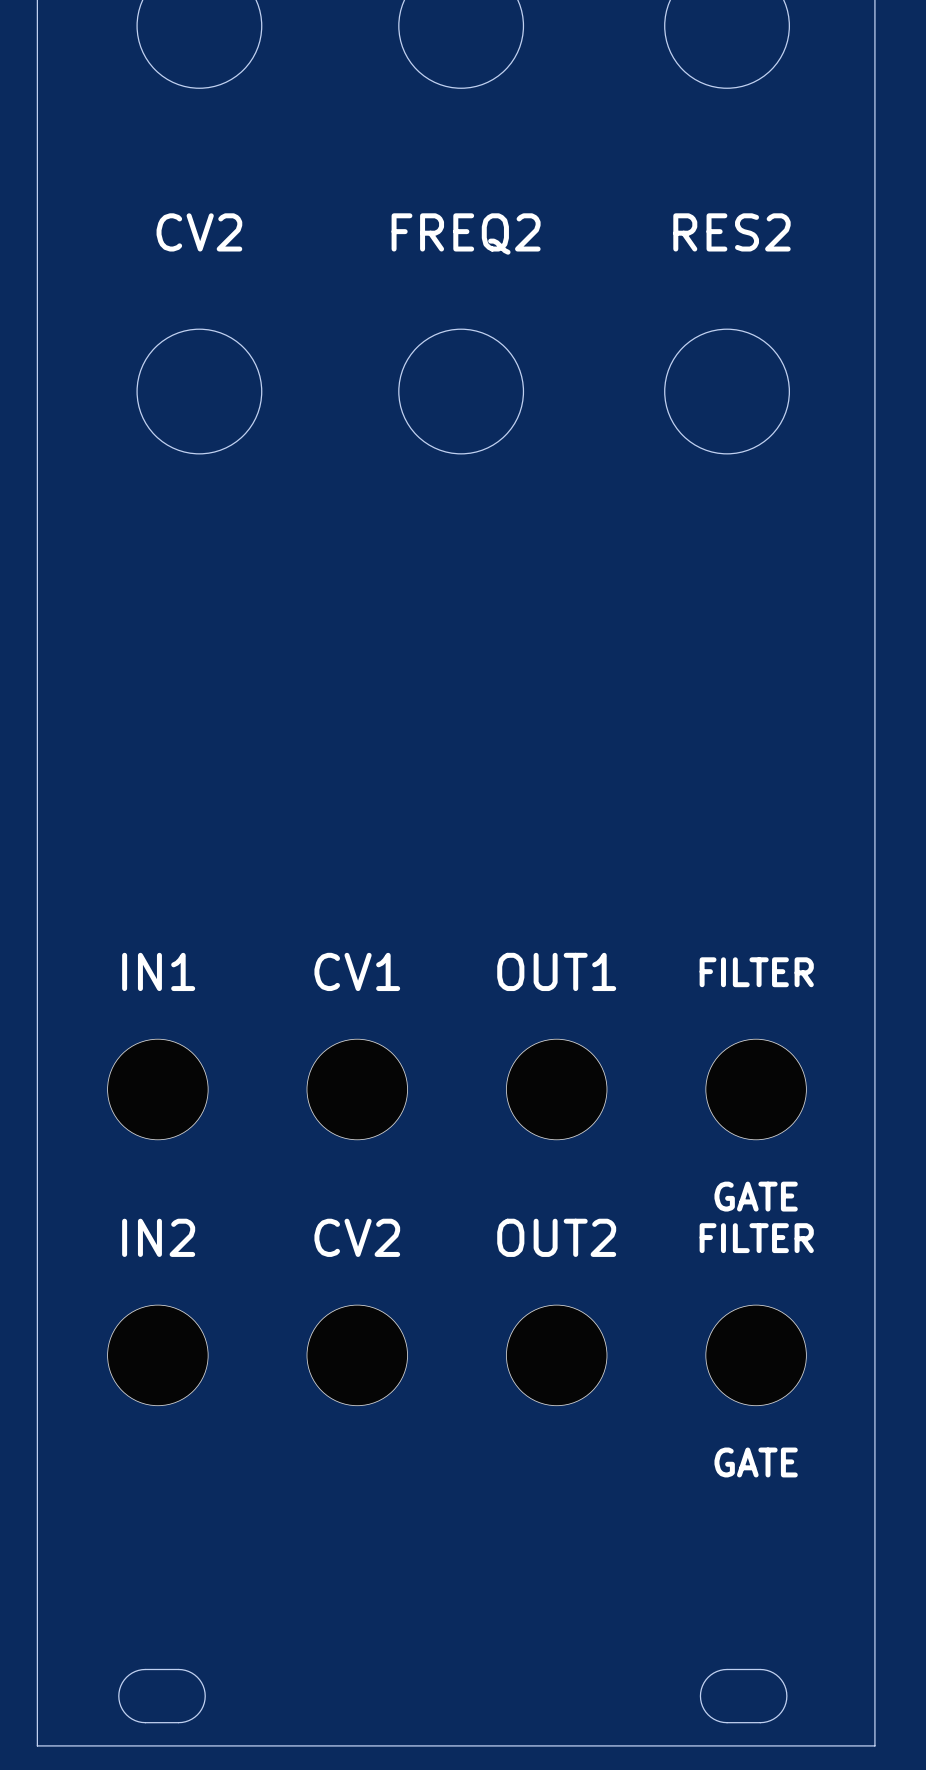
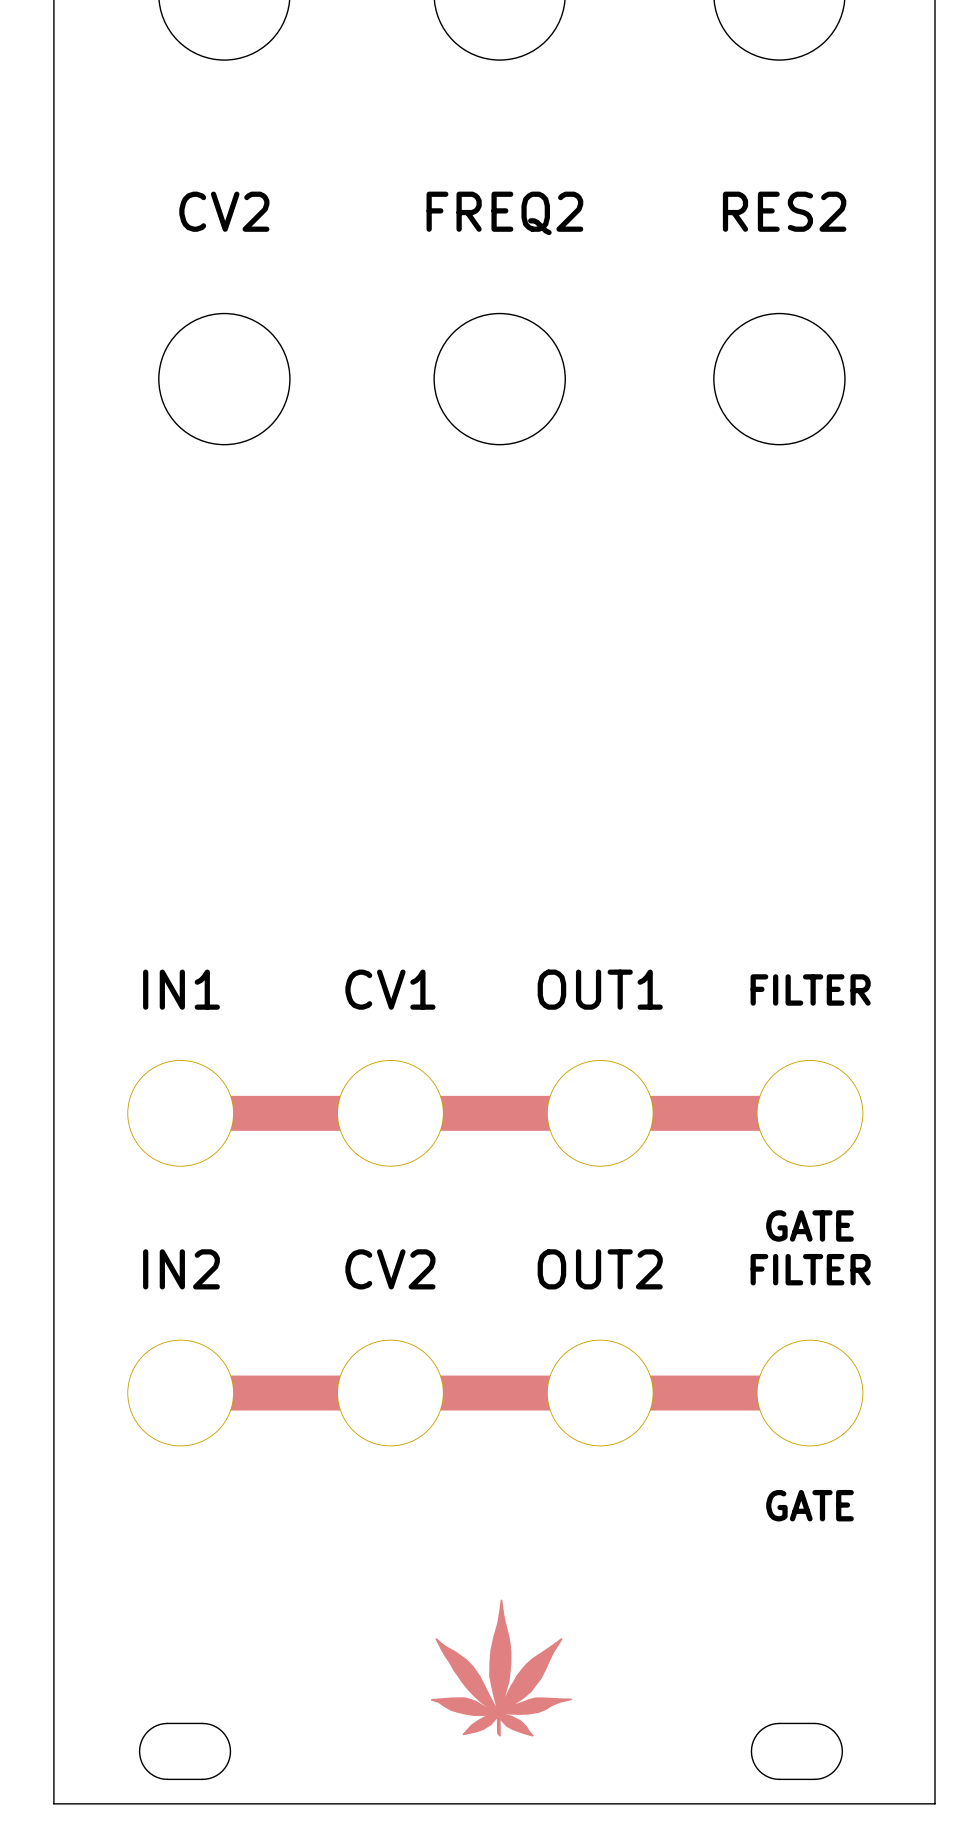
track: none -> (145, 1113) (844, 1113)
track: none -> (145, 1393) (844, 1393)
drawing: none -> [430, 1599, 572, 1737]

